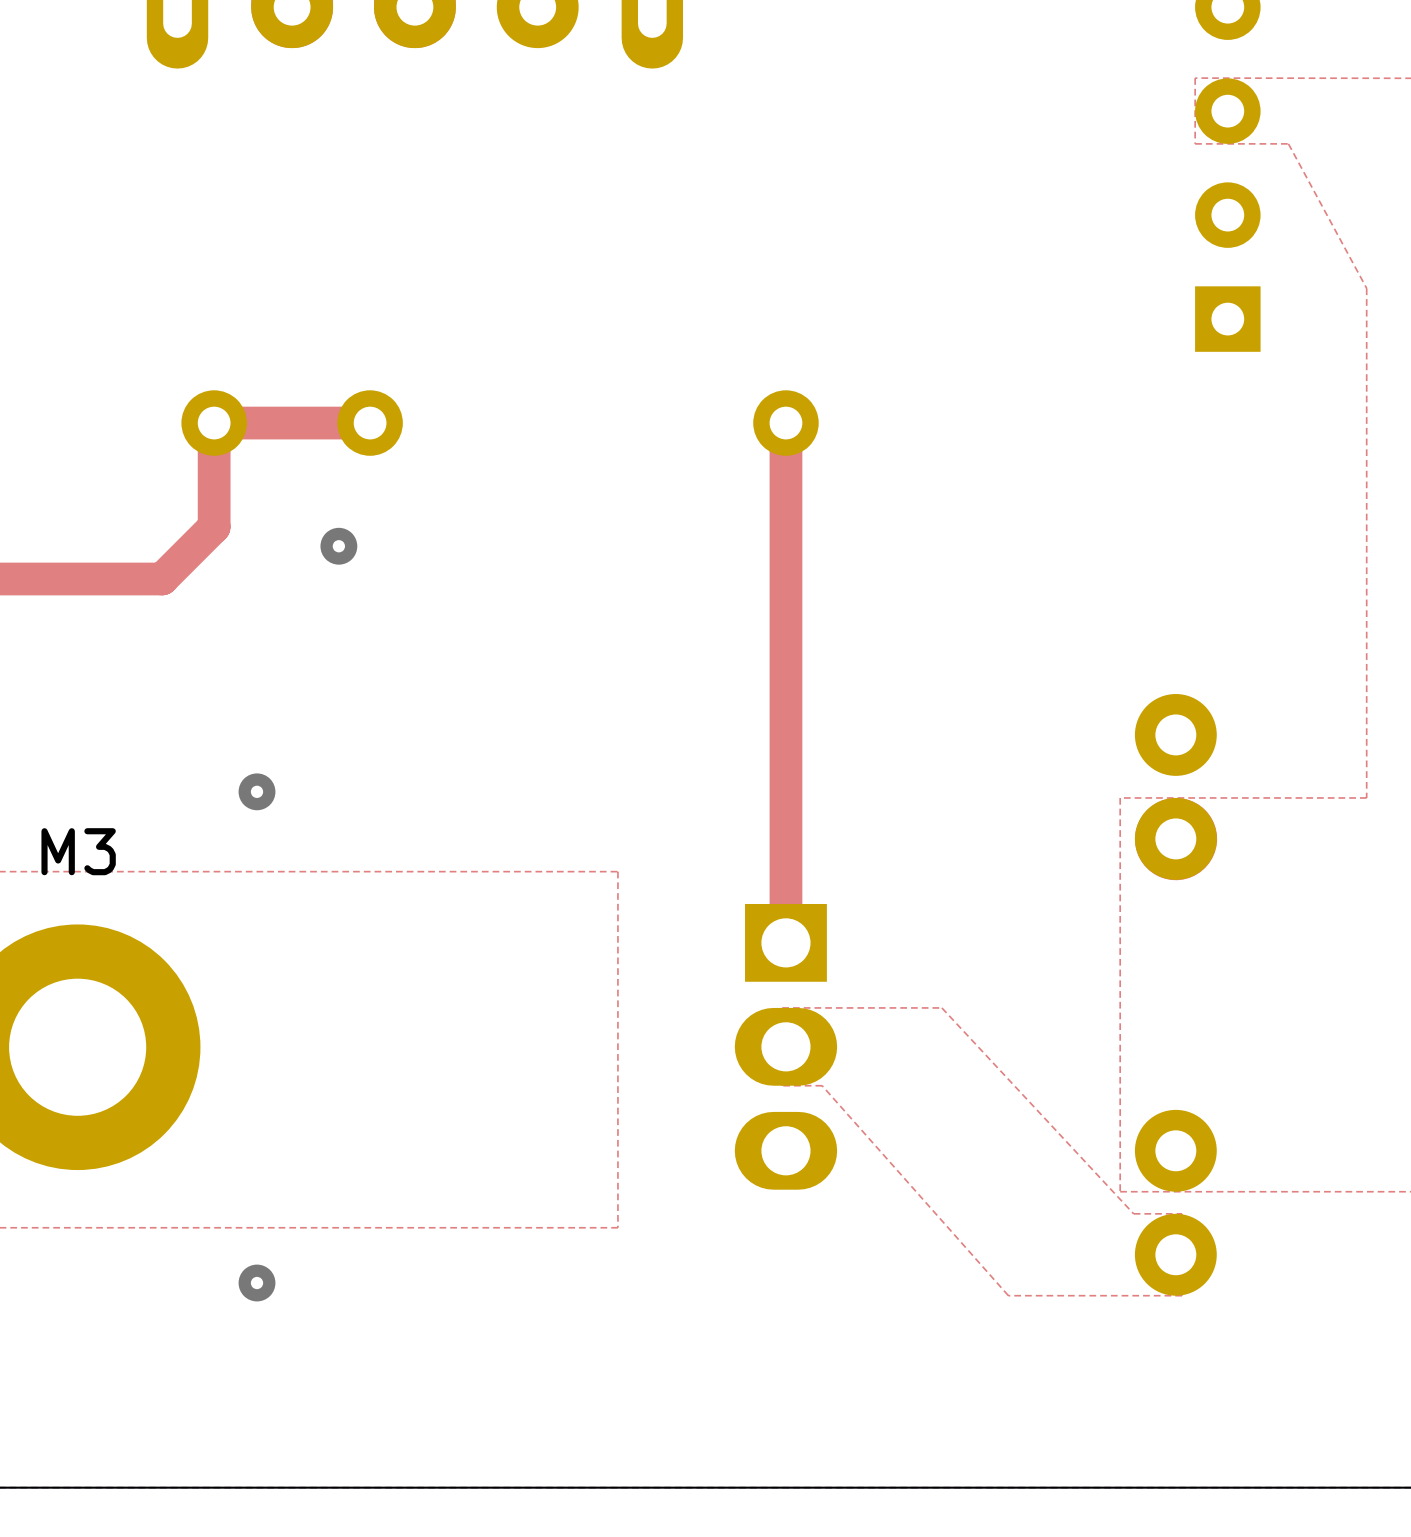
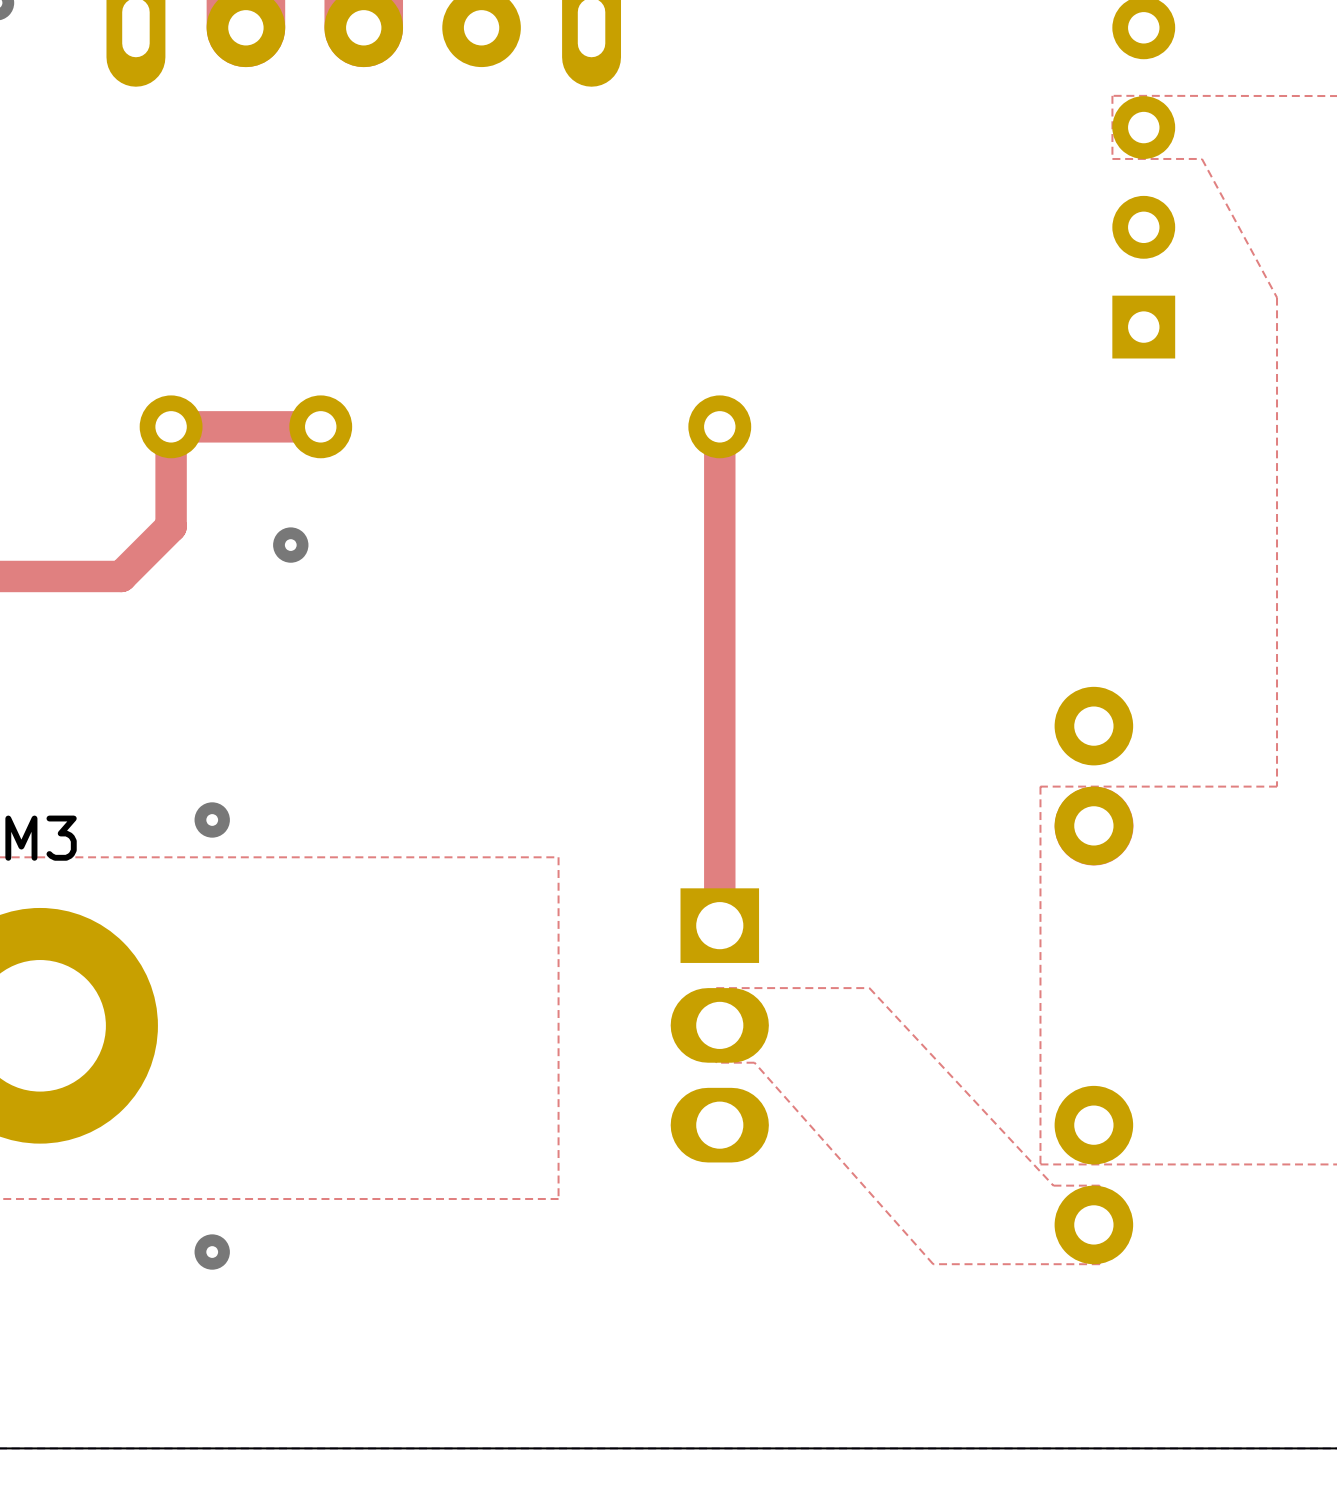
via position: (257, 791) -> (212, 819)

